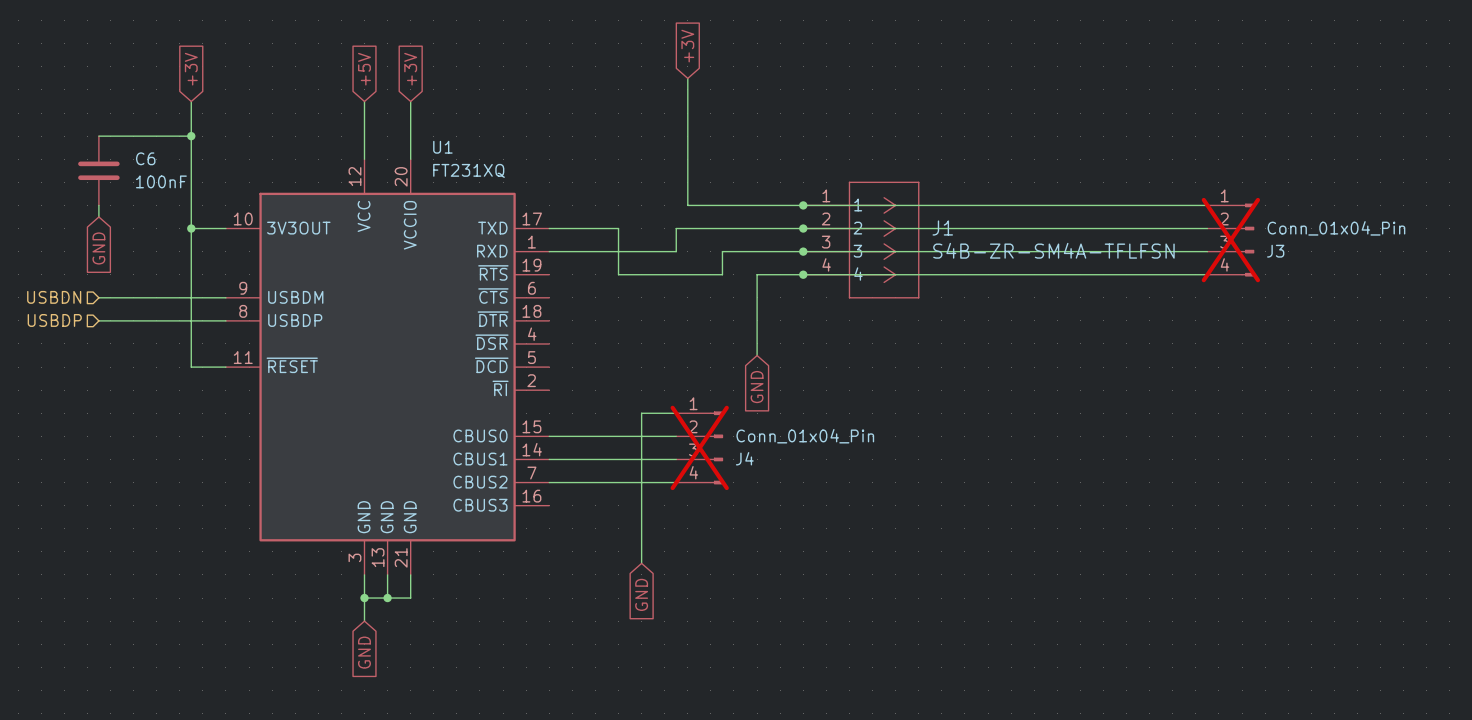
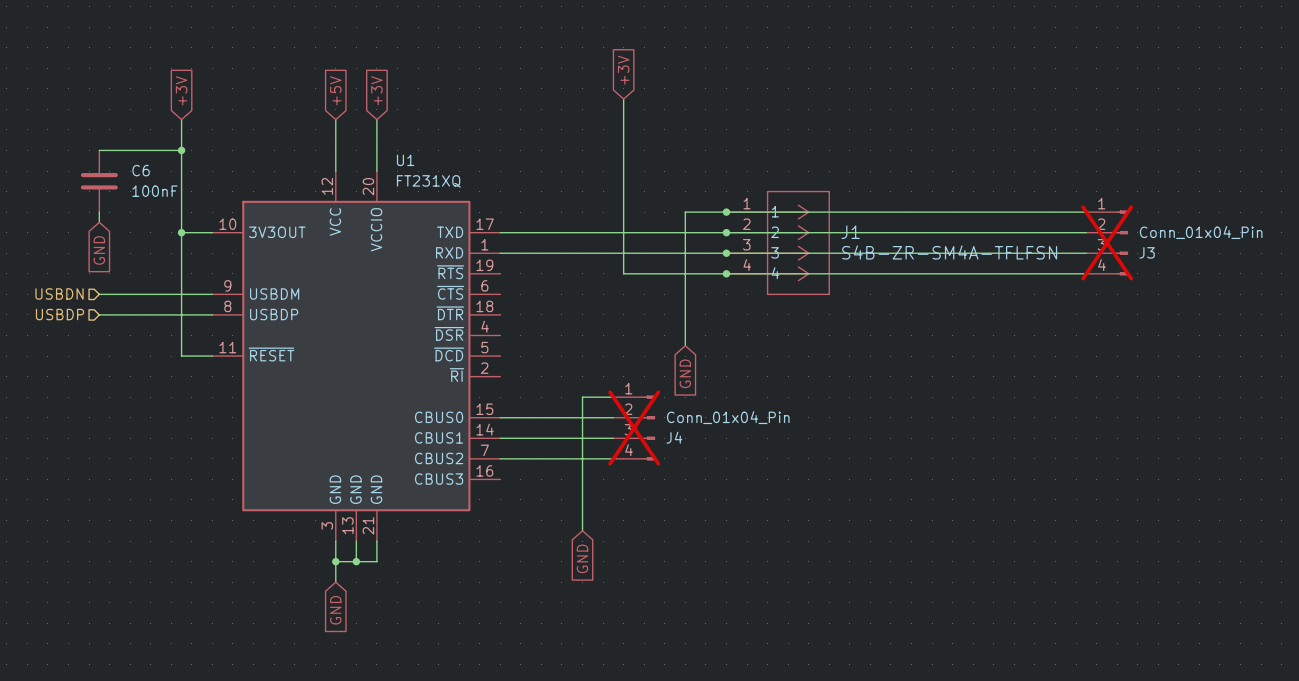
wire: (687, 205) (757, 205) -> (654, 273) (685, 273) (685, 212)
wire: none -> (623, 212) (623, 273)
wire: (618, 228) (618, 274) (687, 274) -> (561, 232) (613, 232)
wire: (676, 228) (676, 251) -> none
wire: (722, 251) (722, 274) -> (654, 253) (613, 253)

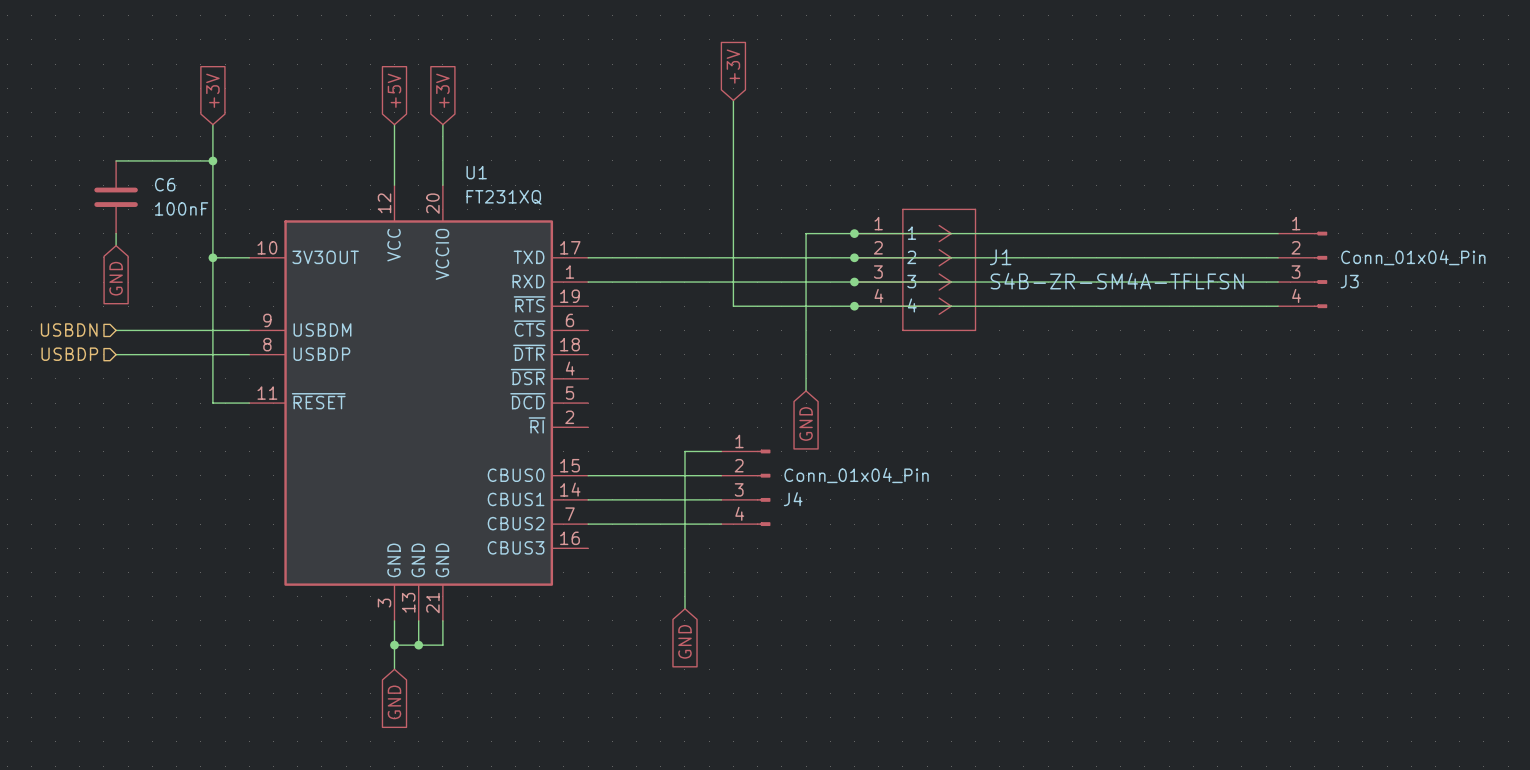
J3 do-not-place cross: (1107, 242) -> none
J4 do-not-place cross: (634, 428) -> none

